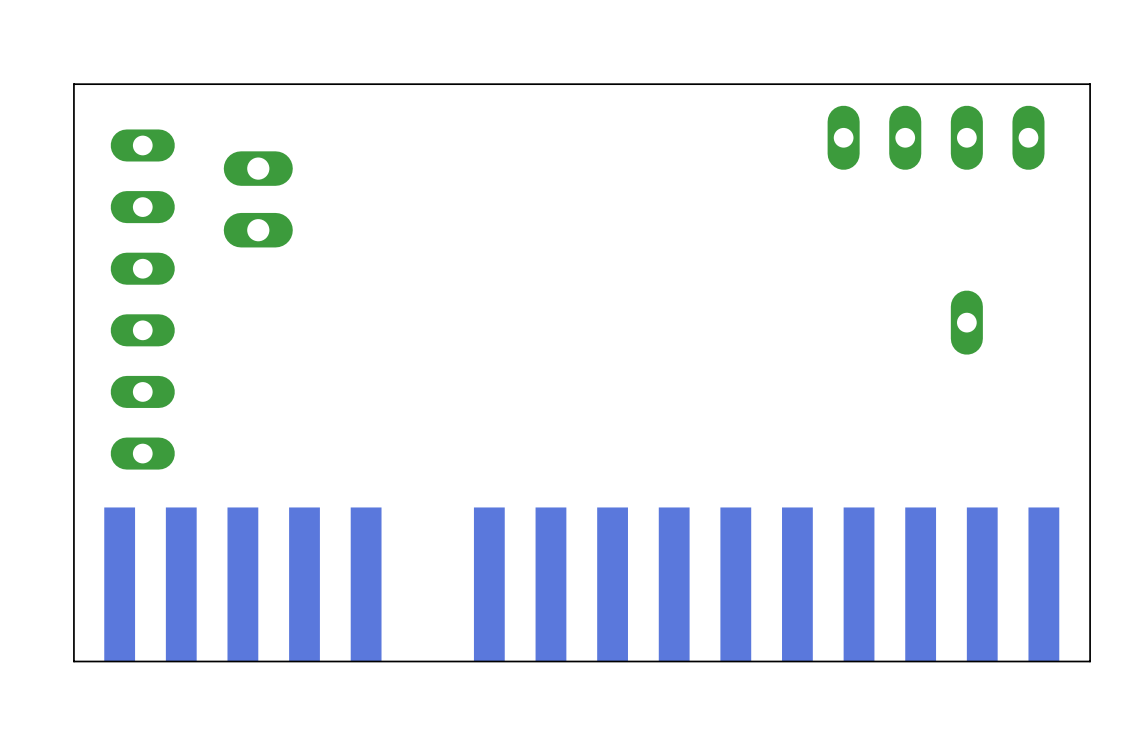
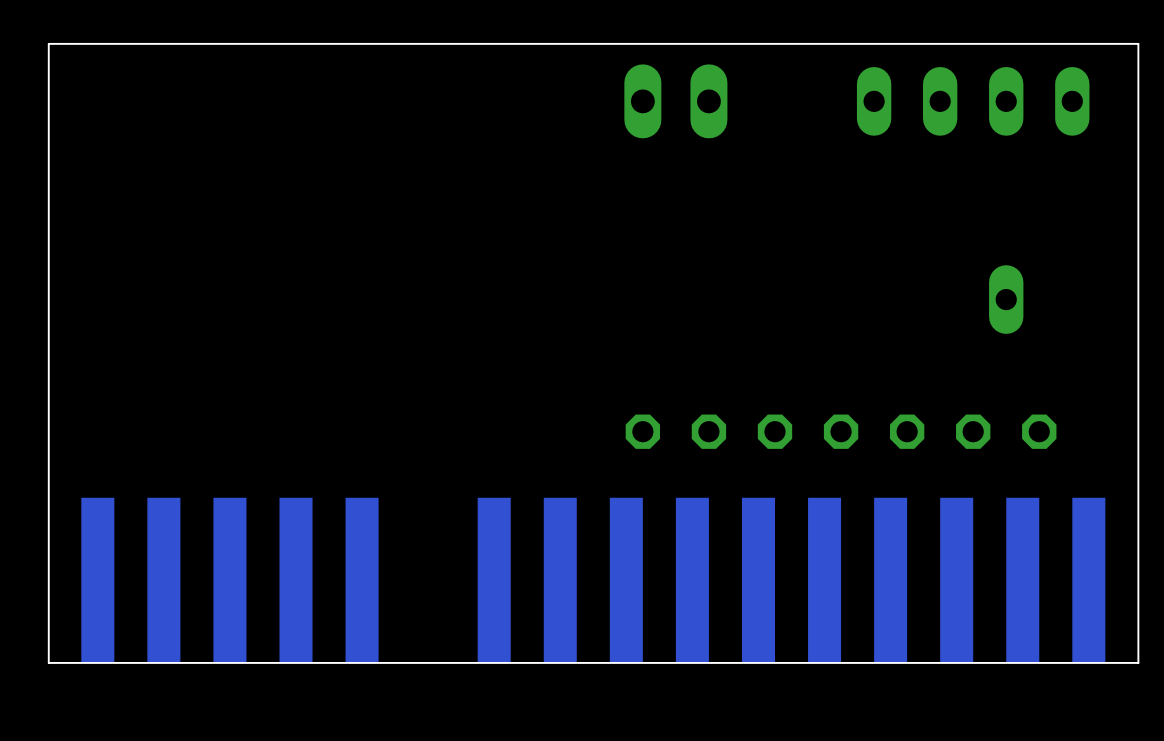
part rotation: 0° (258, 199) -> 90° clockwise (675, 101)
part position: (258, 199) -> (675, 101)
part: (142, 299) -> none
part: none -> (841, 431)

